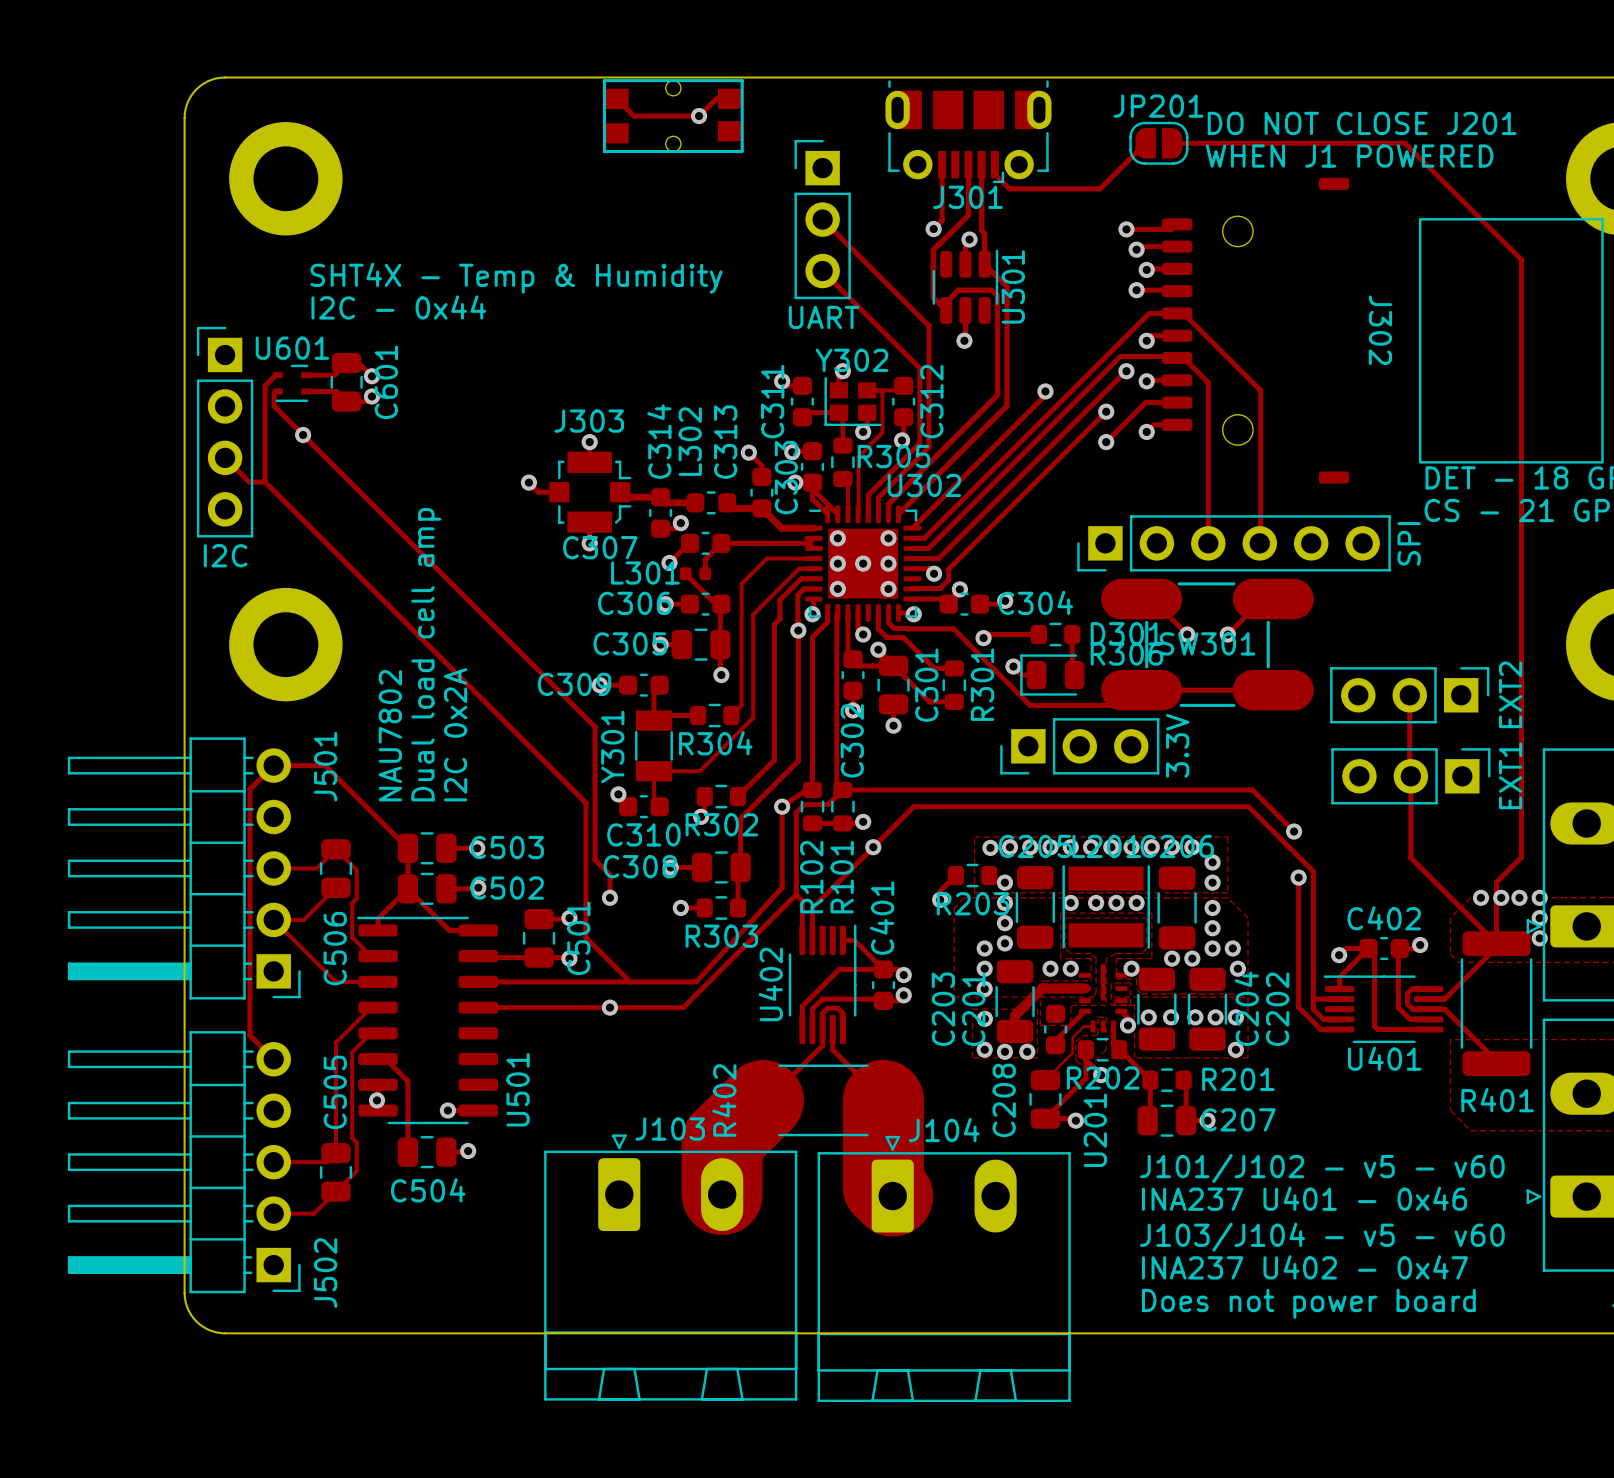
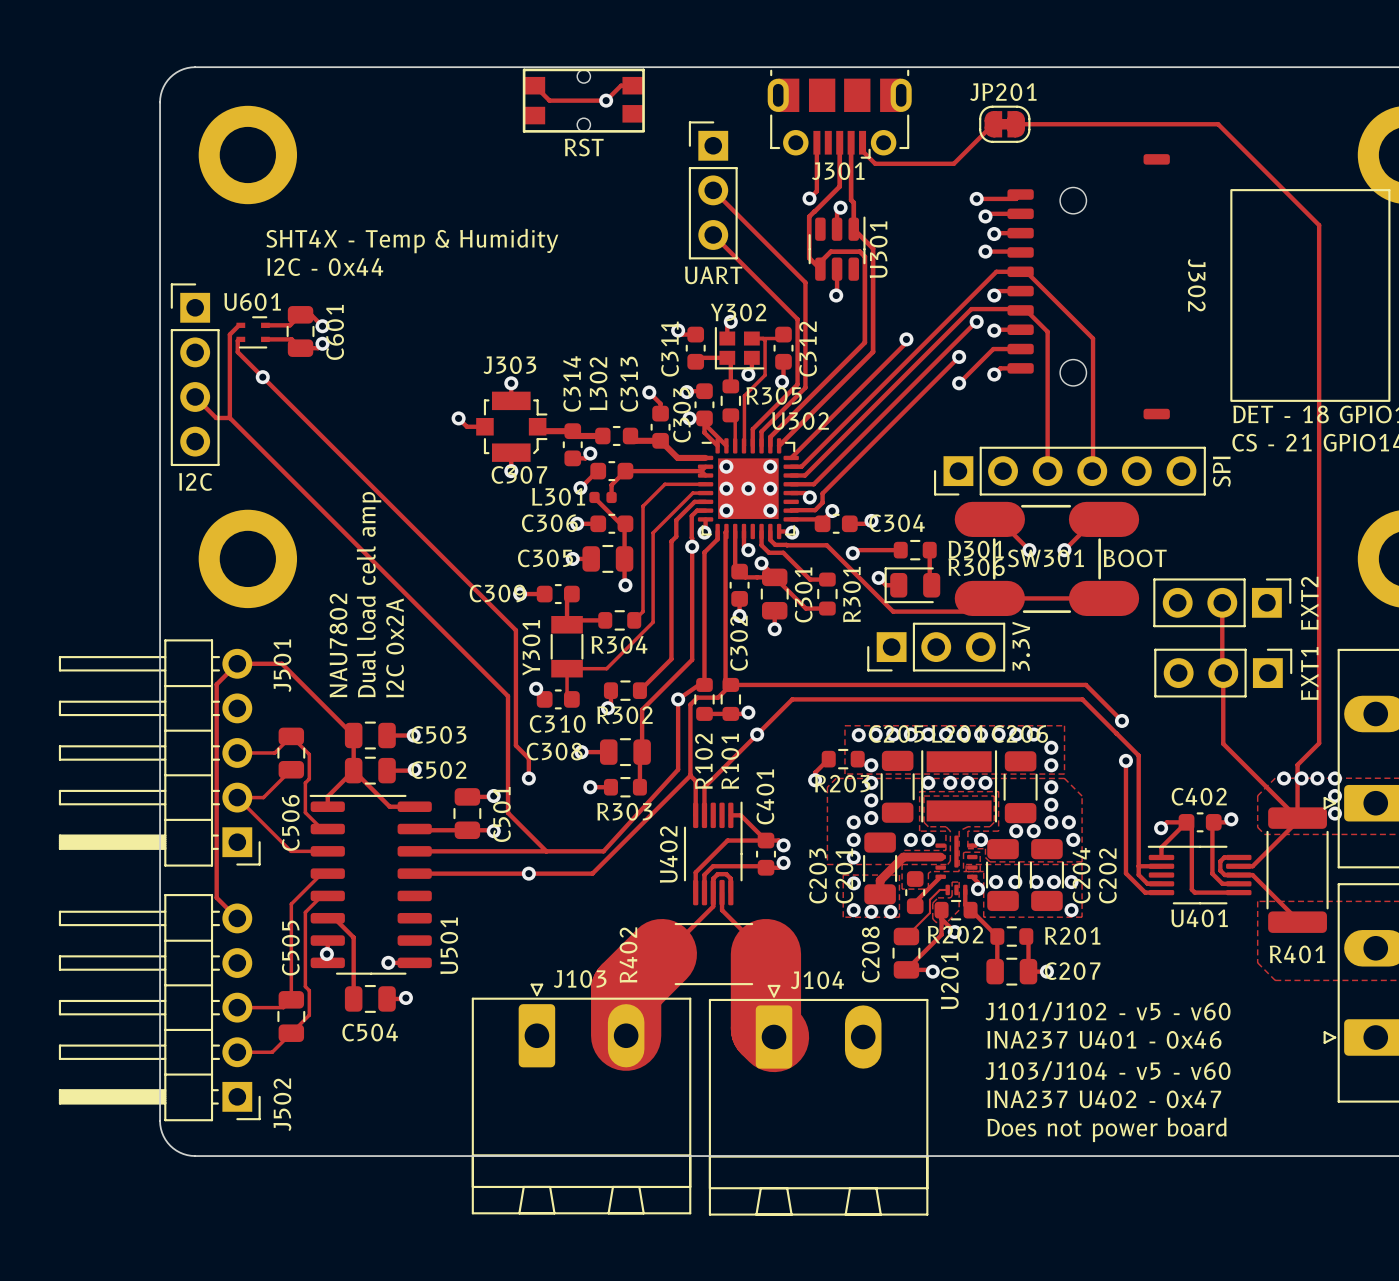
JP201 footprint: [1129, 121, 1189, 165] -> [979, 105, 1031, 143]
text: DO NOT CLOSE J201 (1362, 123) -> none
text: WHEN J1 POWERED (1349, 156) -> none
part value: none -> RST (584, 147)
SW301 value: none -> BOOT (1135, 558)

